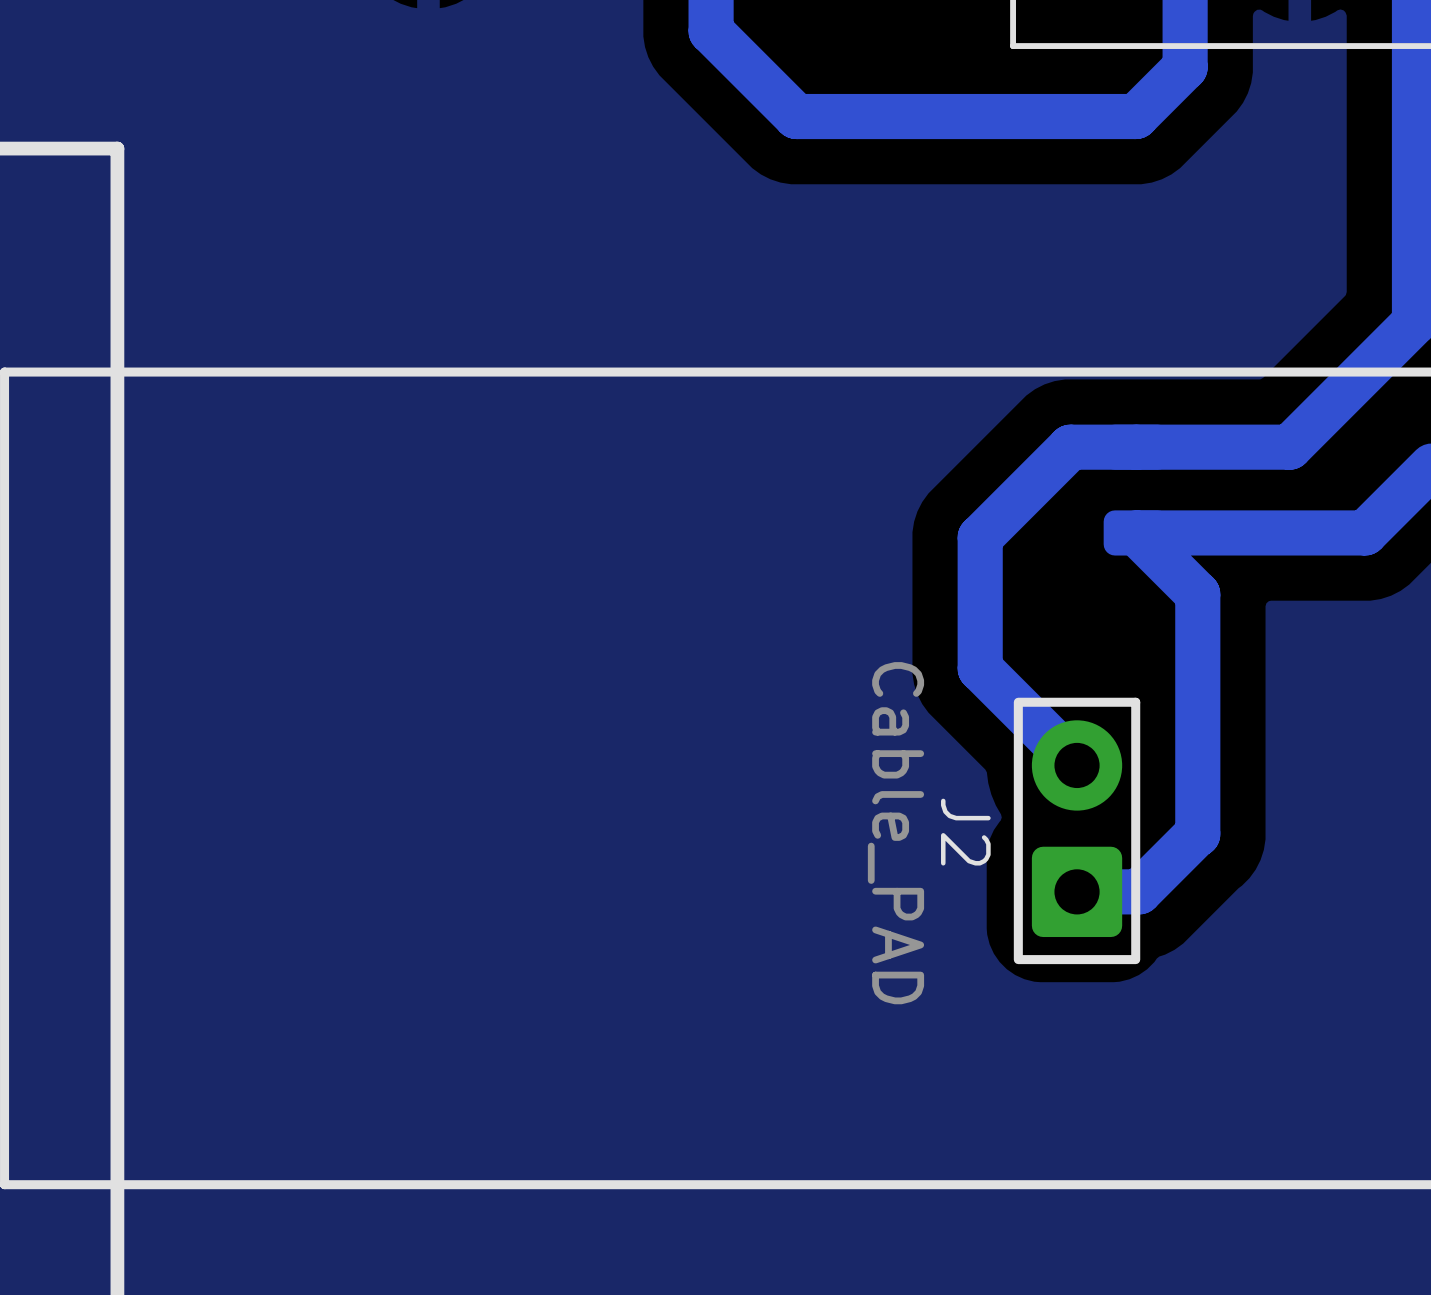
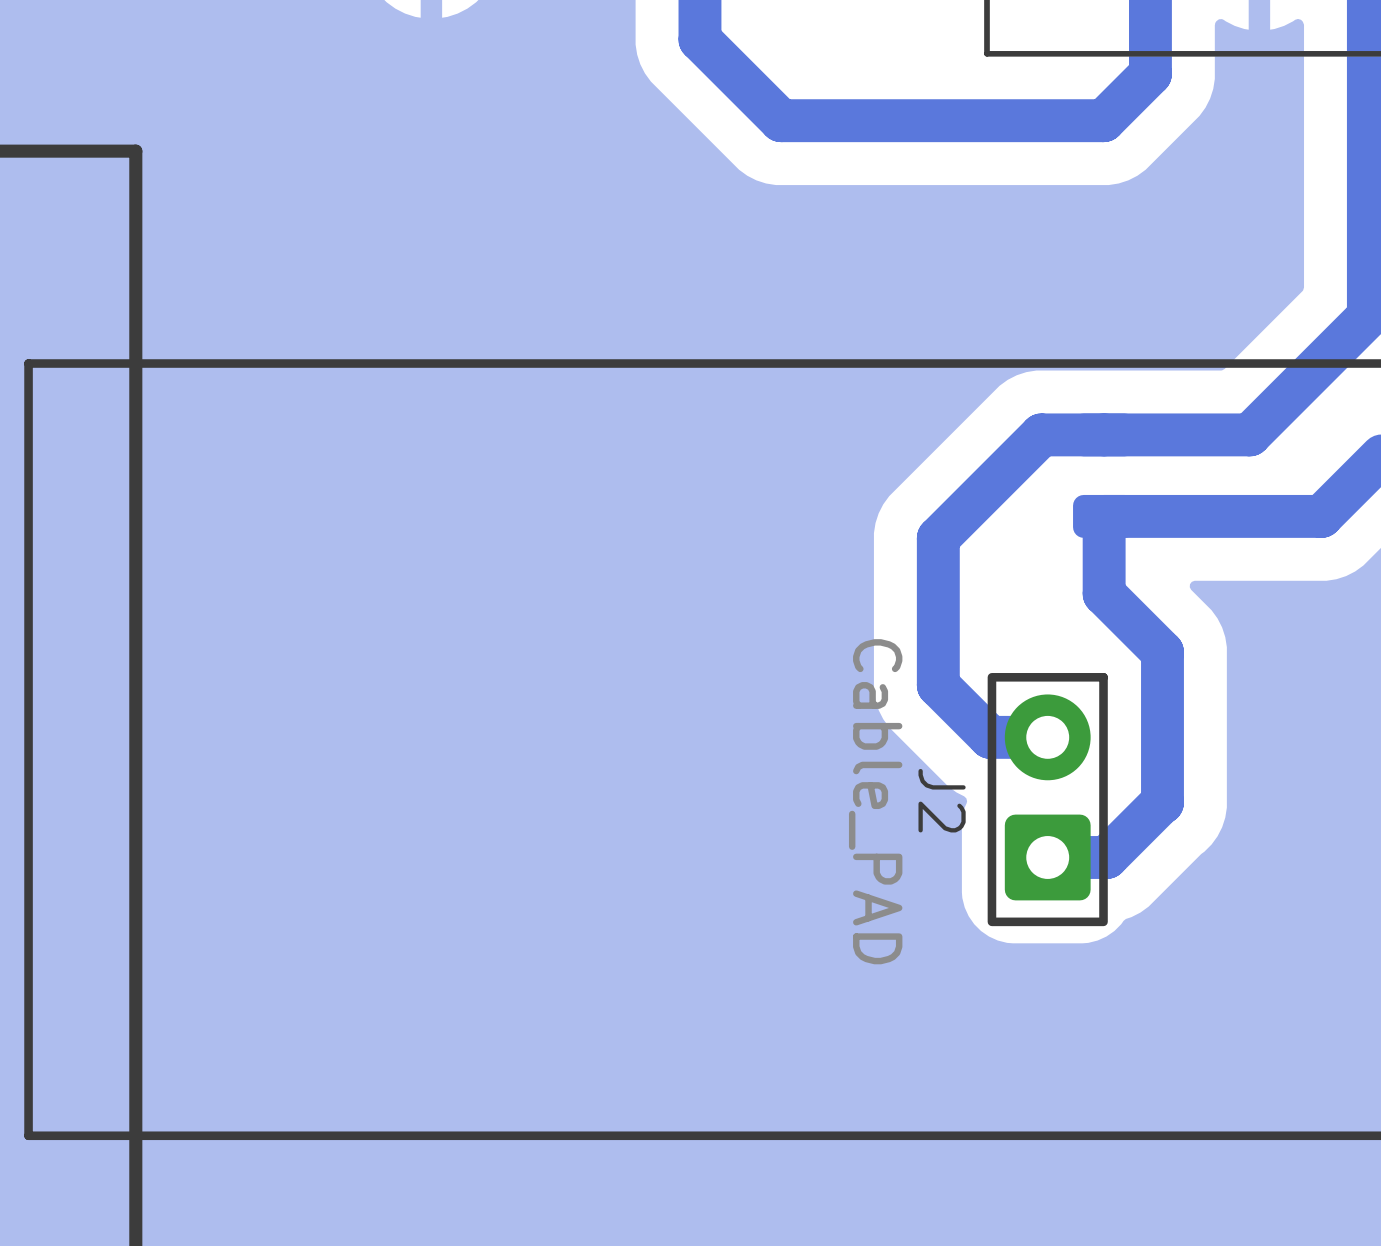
bottom track: (1136, 532) (1197, 594) (1197, 675) -> (1104, 516) (1104, 593) (1162, 652)
bottom track: (980, 537) (980, 668) (1077, 765) -> (955, 520) (938, 538) (938, 685) (990, 737) (1047, 737)

